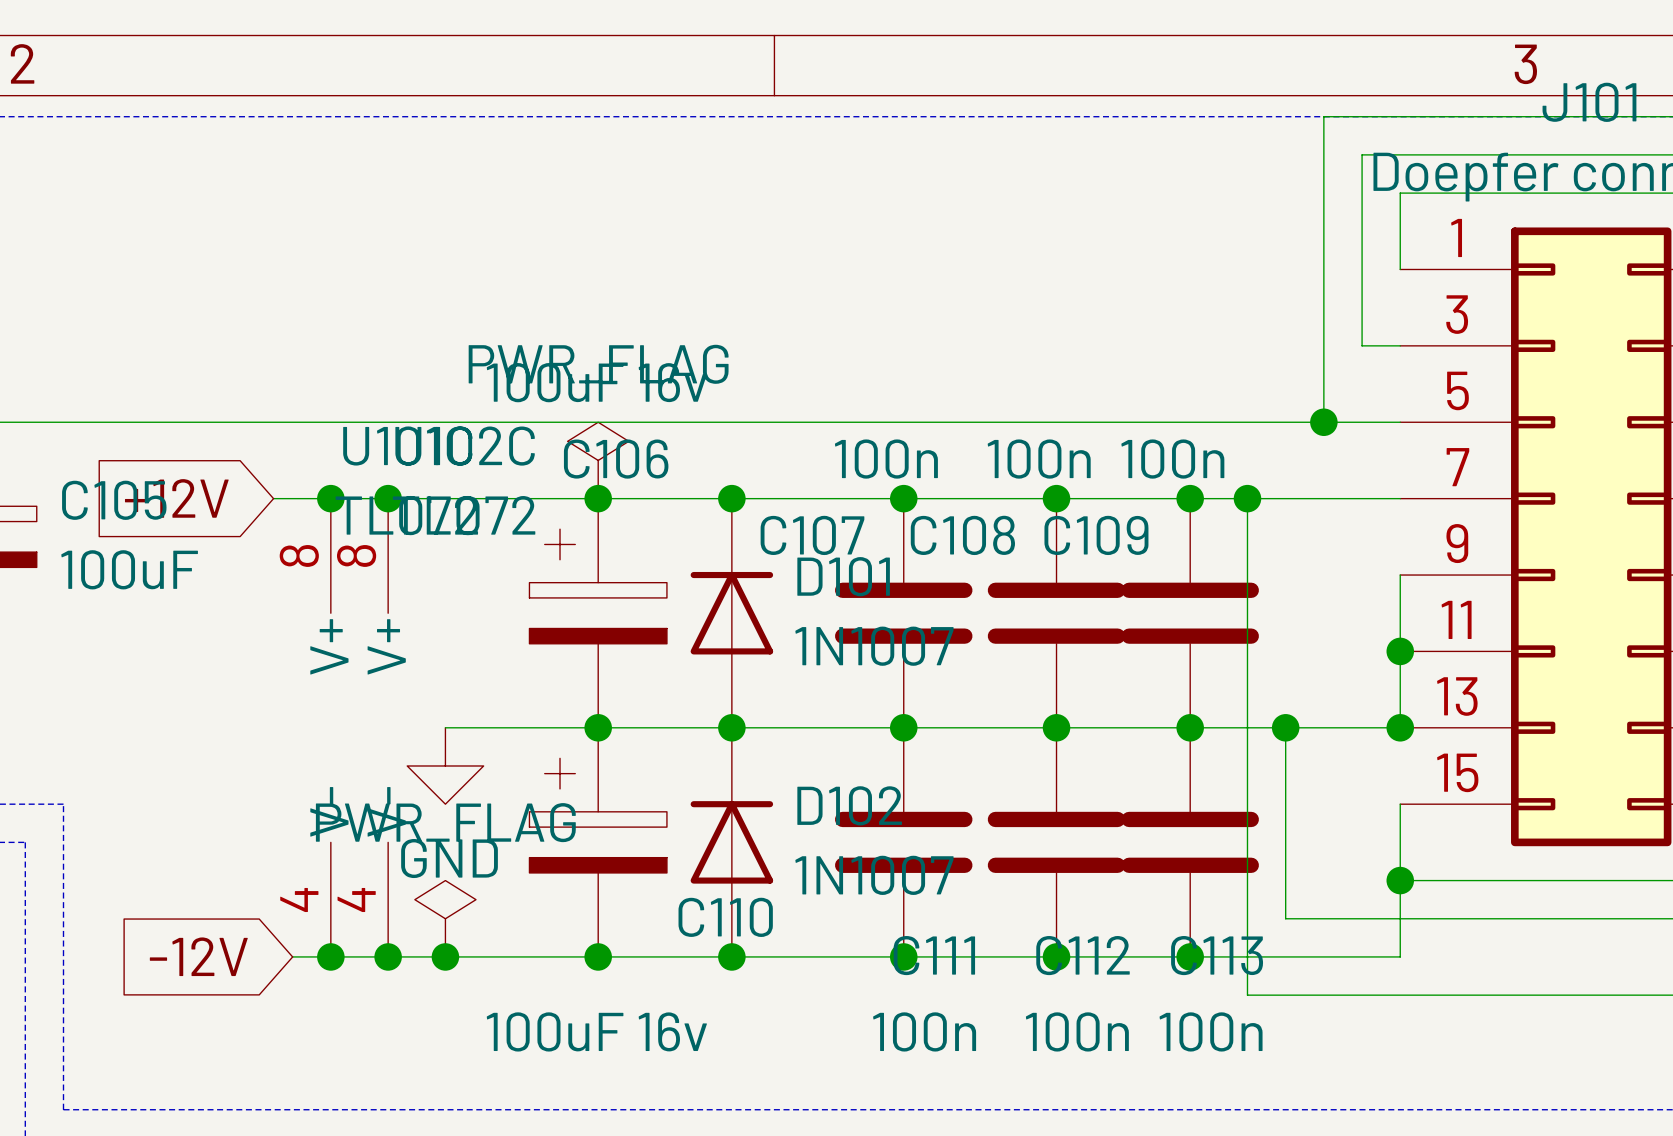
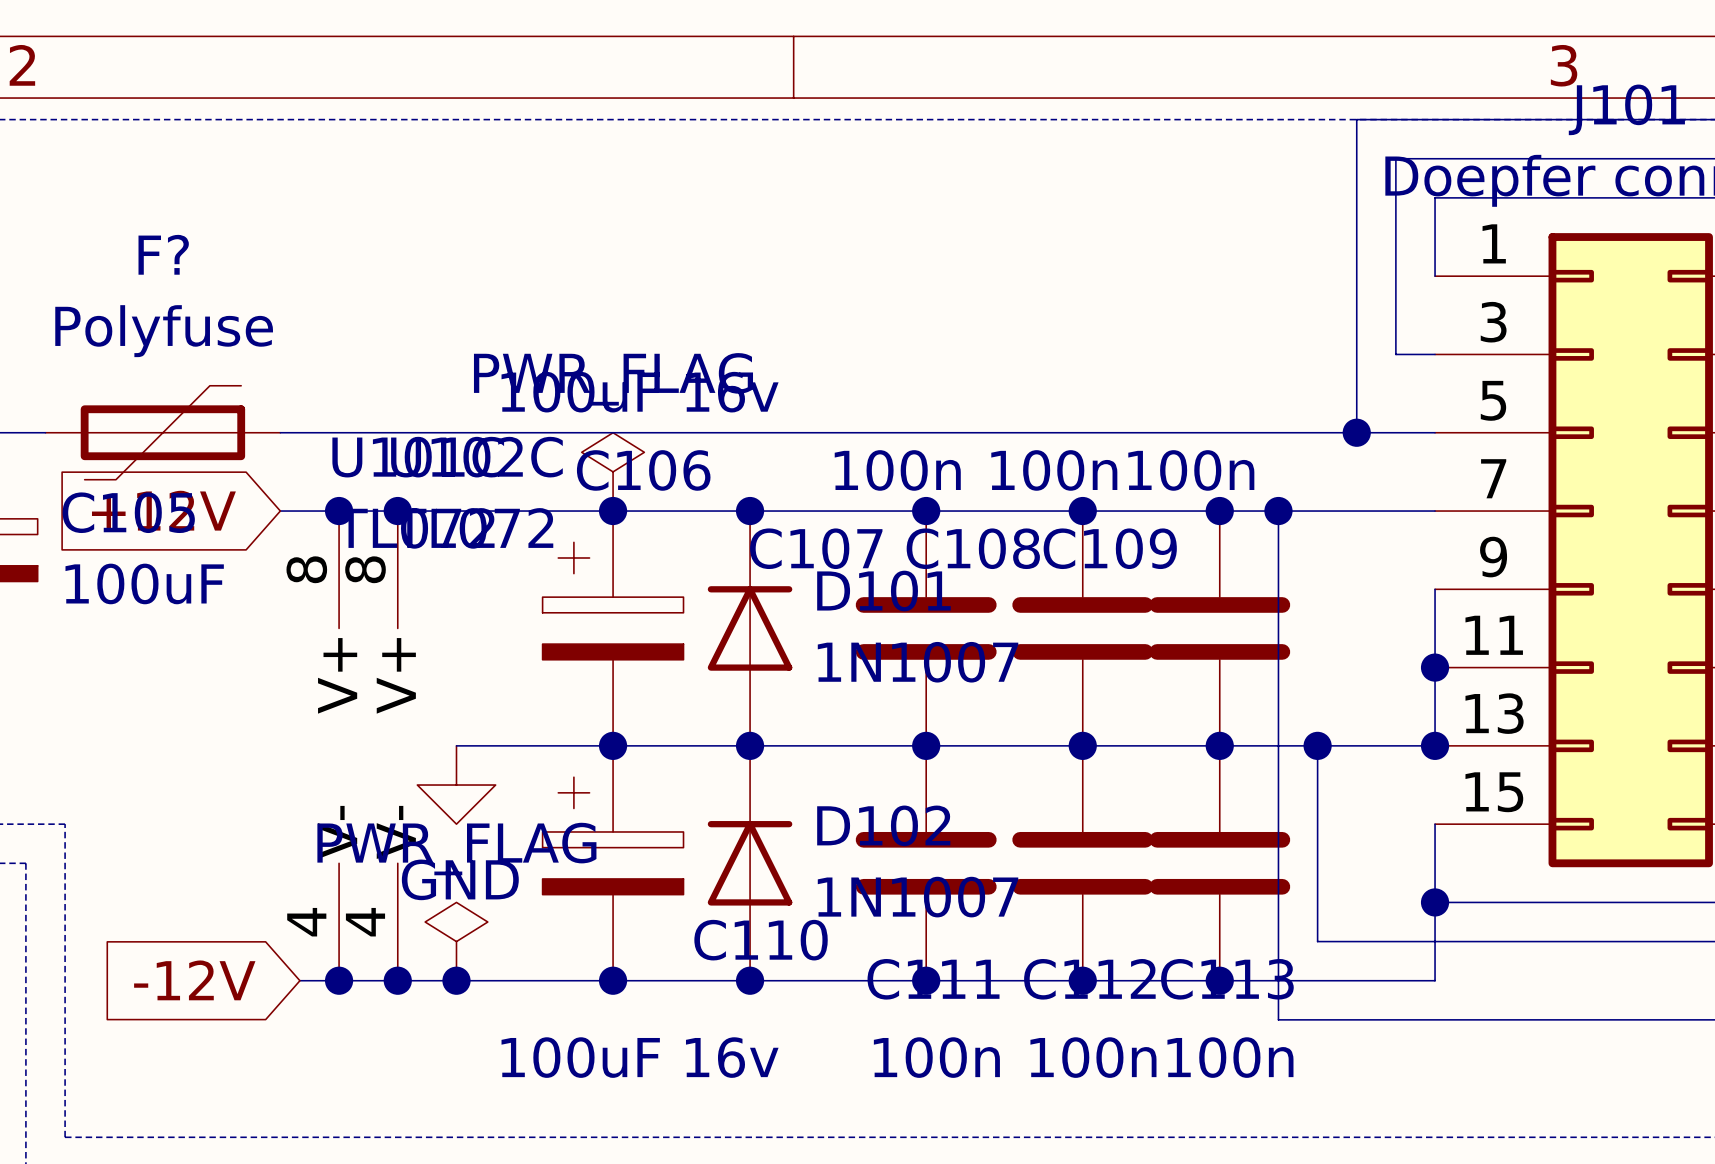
F?: none -> Polyfuse (162, 432)

